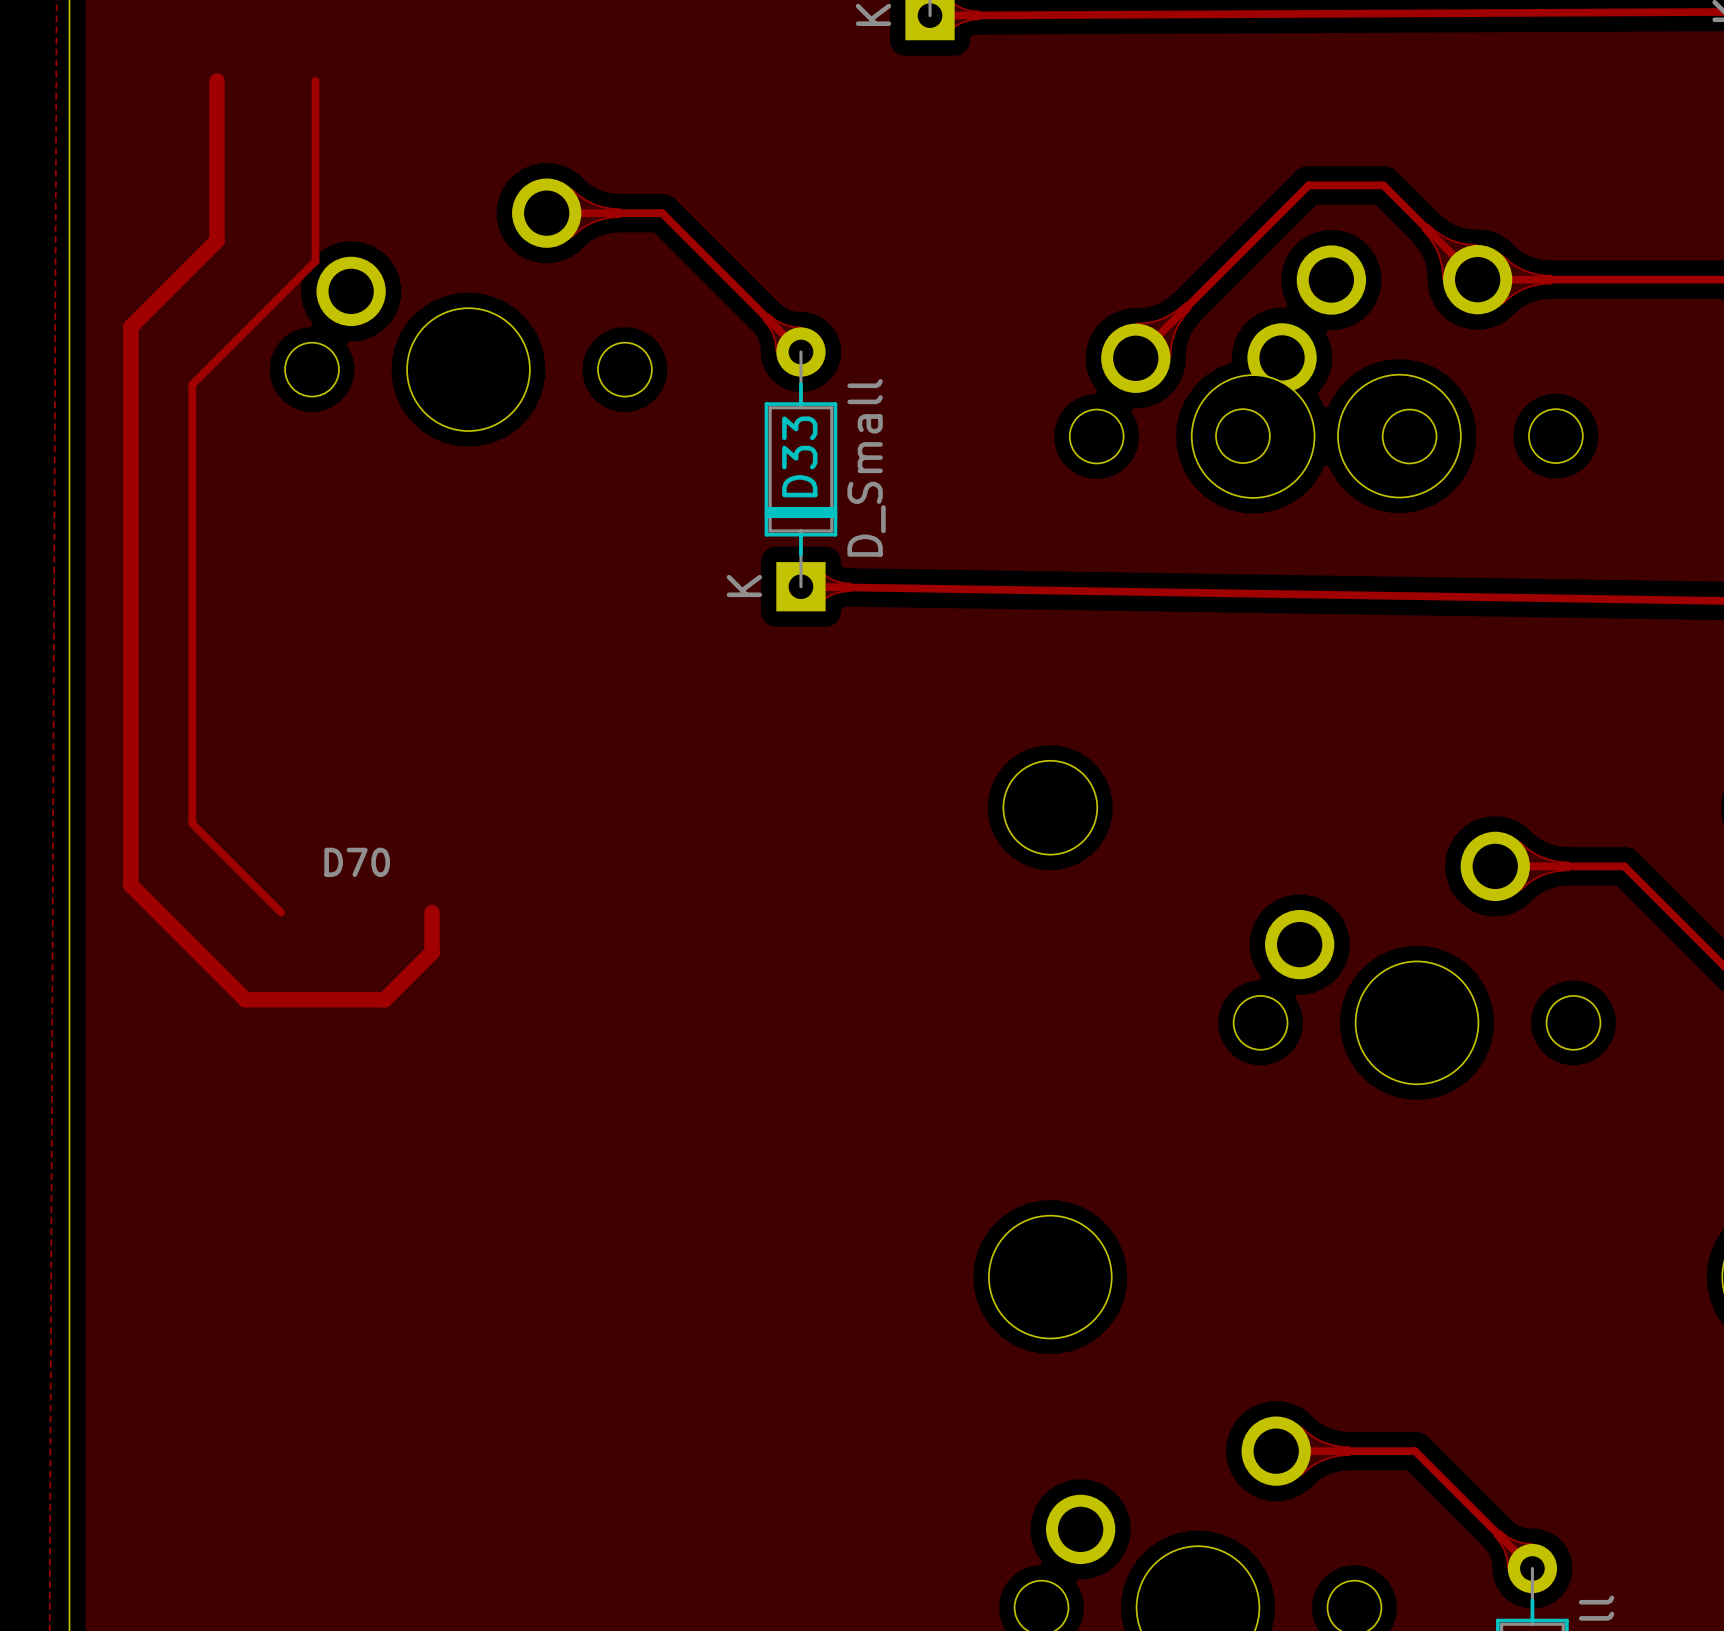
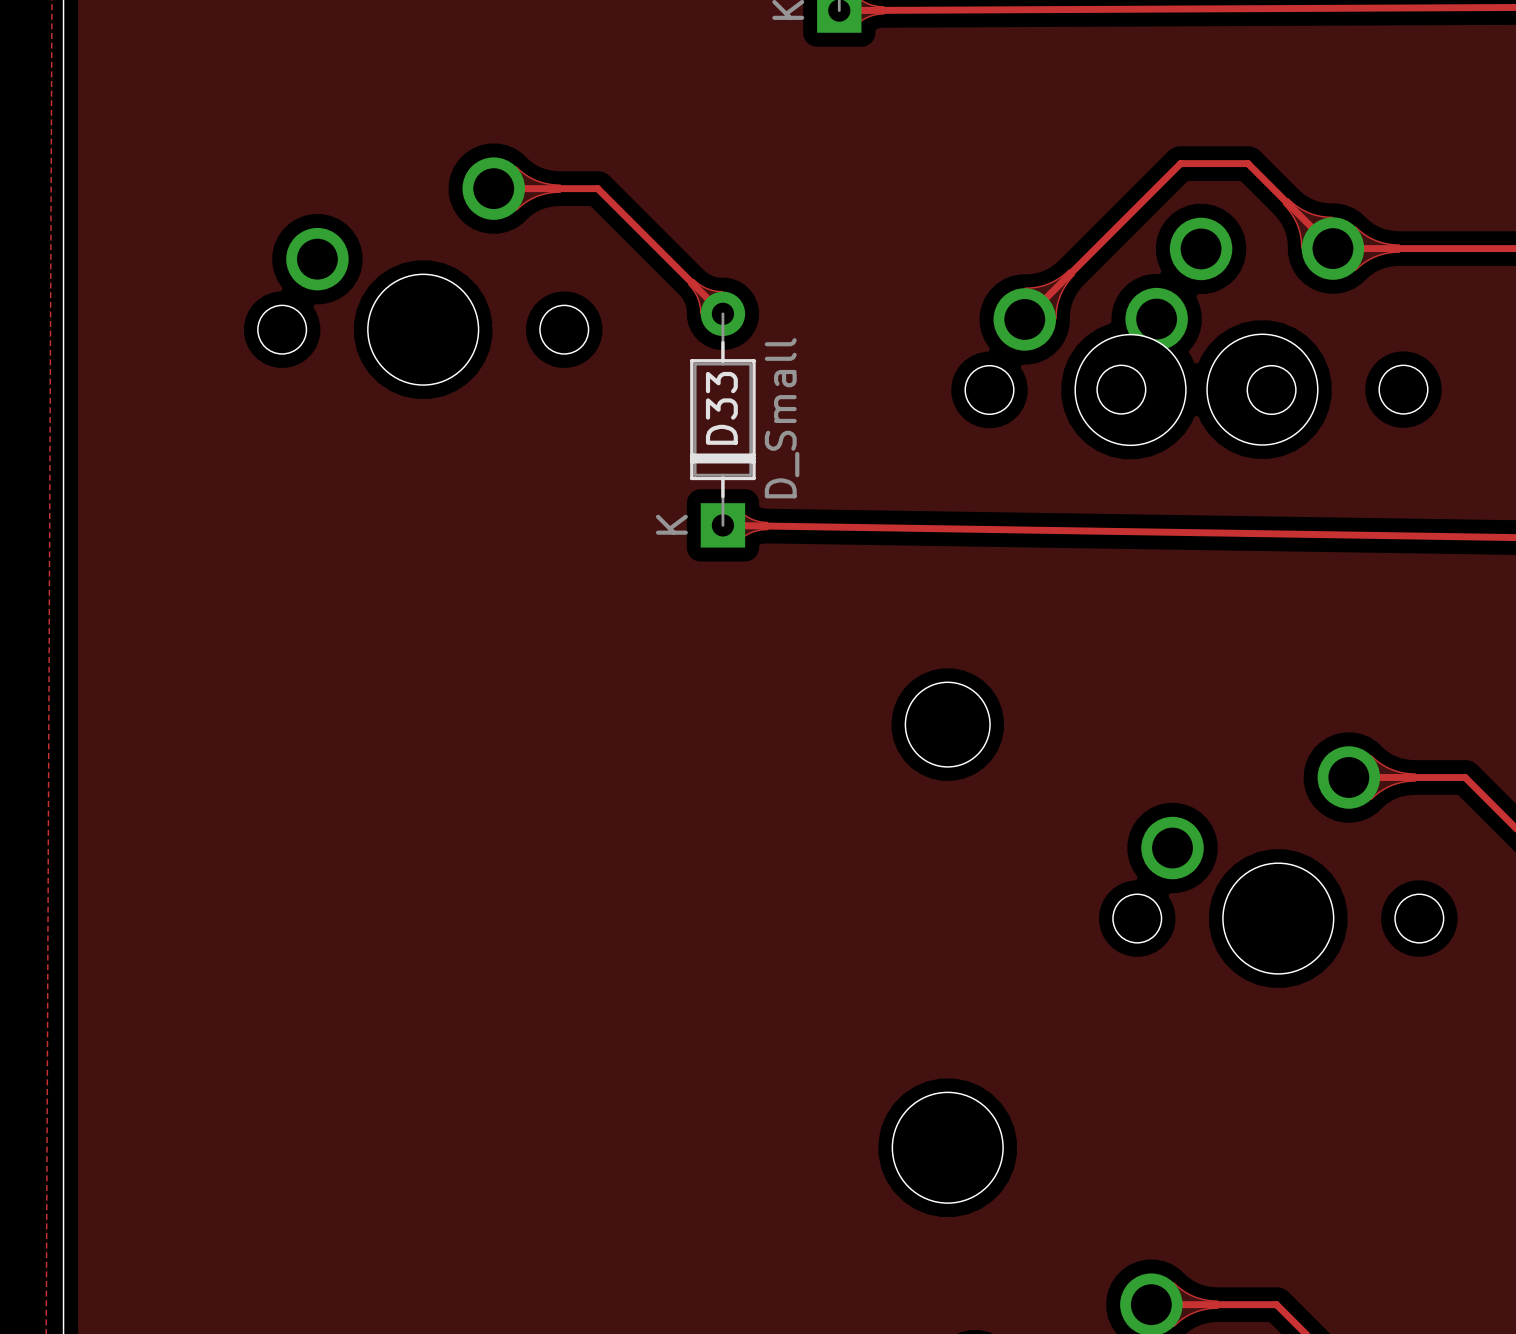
track: (216, 80) (216, 240) (130, 326) (130, 885) (245, 999) (384, 999) (432, 952) (432, 912) -> none
track: (315, 80) (315, 261) (192, 384) (192, 823) (281, 912) -> none
D70: (357, 862) -> none

